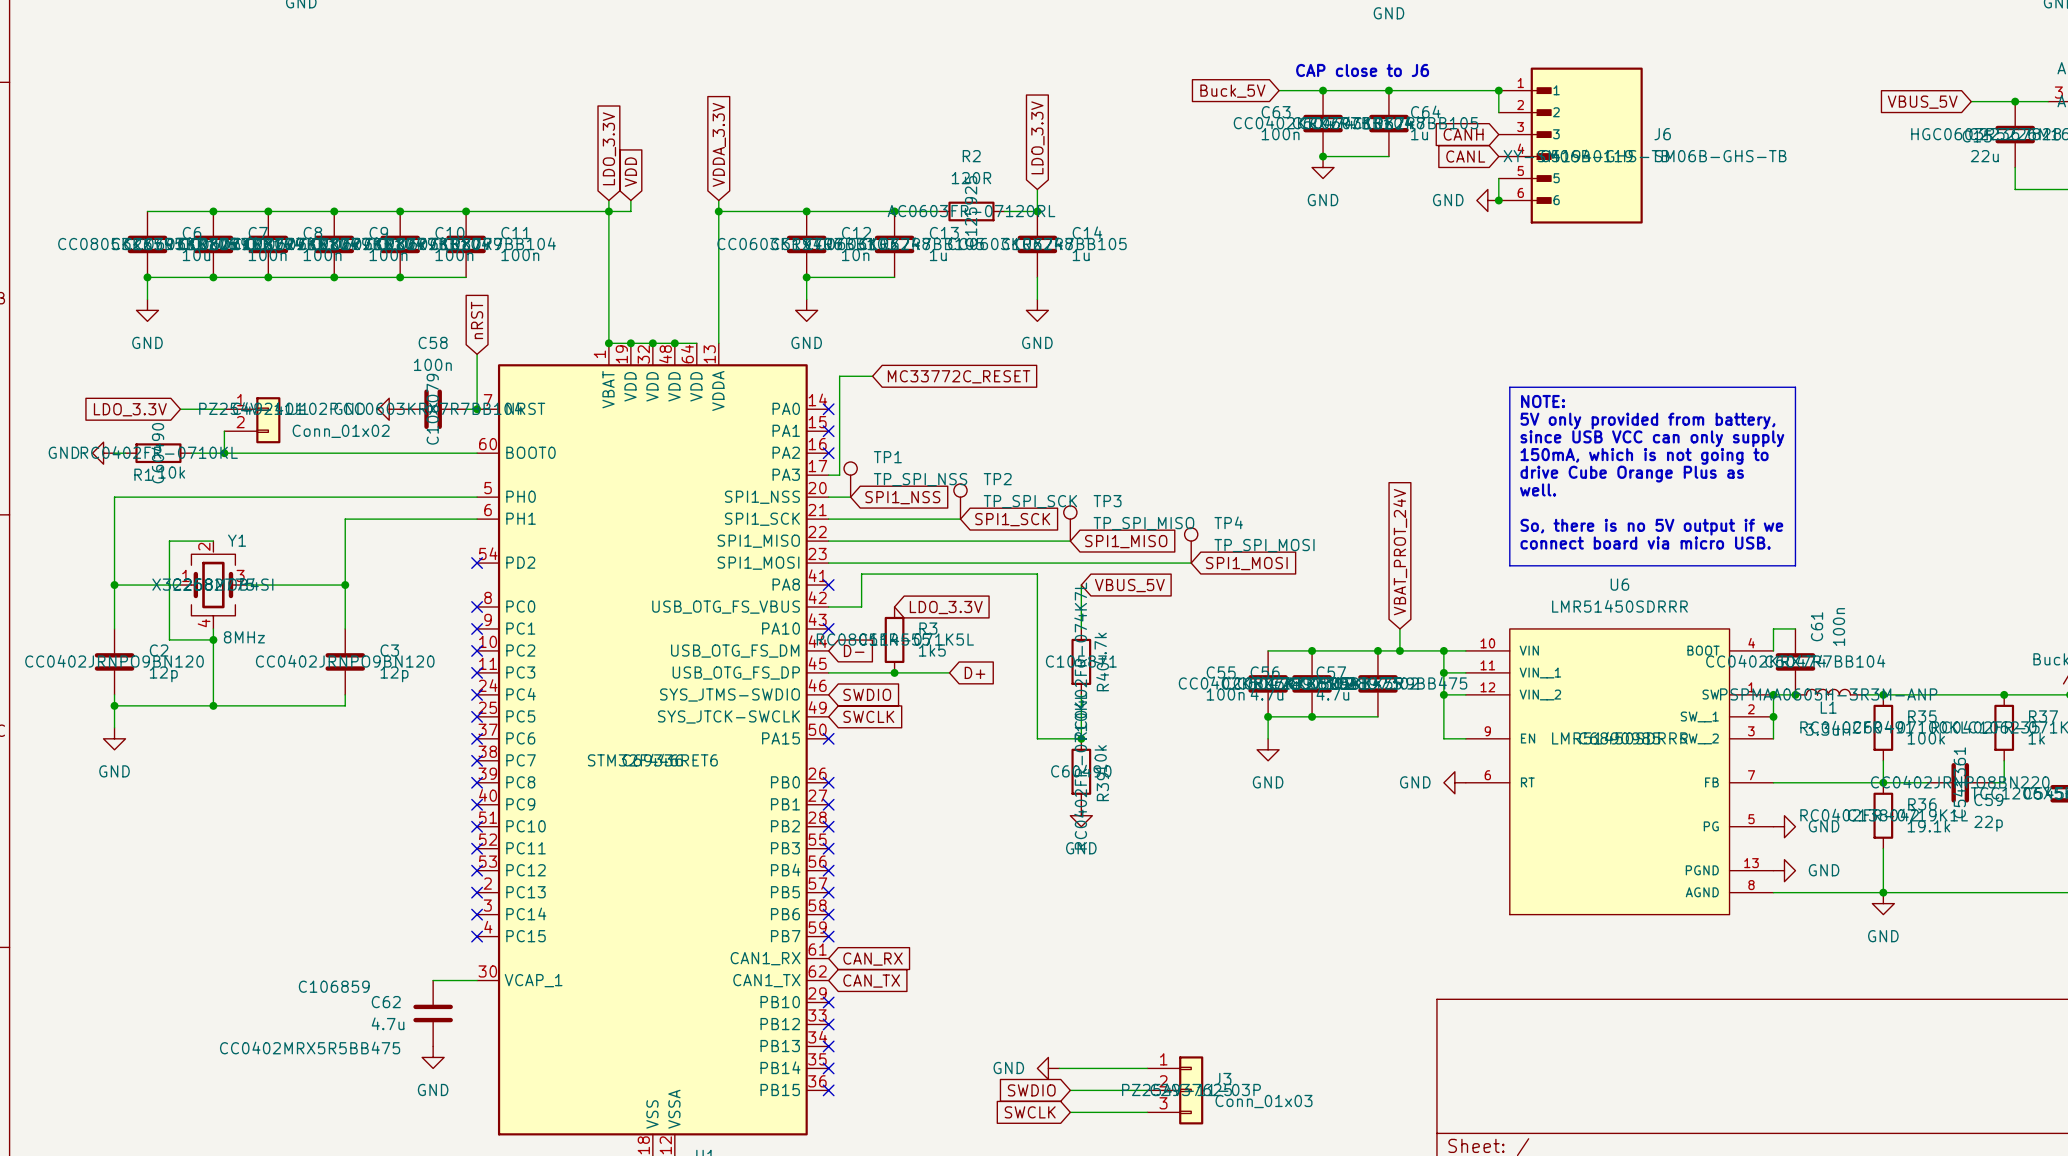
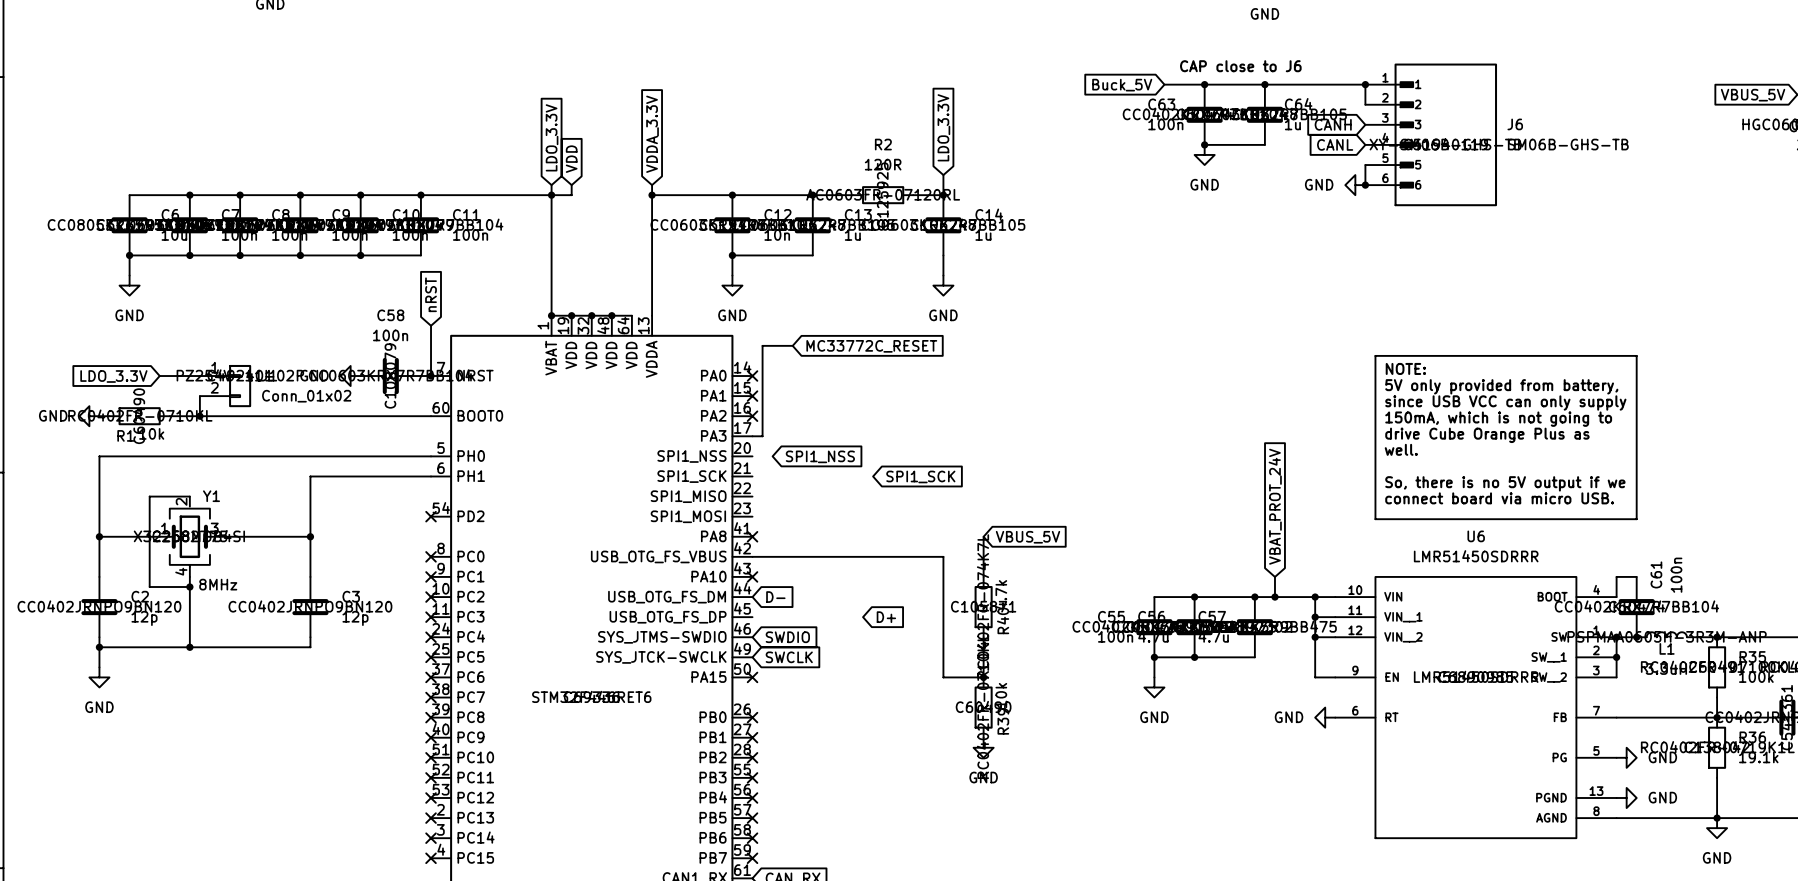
TP1: TP_SPI_NSS (850, 479) -> none
wire: (828, 497) (850, 497) -> none
TP2: TP_SPI_SCK (960, 501) -> none
wire: (828, 519) (960, 519) -> none
TP3: TP_SPI_MISO (1070, 523) -> none
wire: (828, 541) (1070, 541) -> none
global label: SPI1_MISO (1126, 541) -> none
TP4: TP_SPI_MOSI (1191, 545) -> none
wire: (828, 563) (1191, 563) -> none
global label: SPI1_MOSI (1246, 563) -> none
wire: (861, 606) (861, 574) (1037, 574) (1037, 606) -> (782, 556) (943, 556)
global label: LDO_3.3V (946, 607) -> none
R3: 1k5 (894, 639) -> none
wire: (828, 672) (949, 672) -> none
junction: (894, 672) -> none

